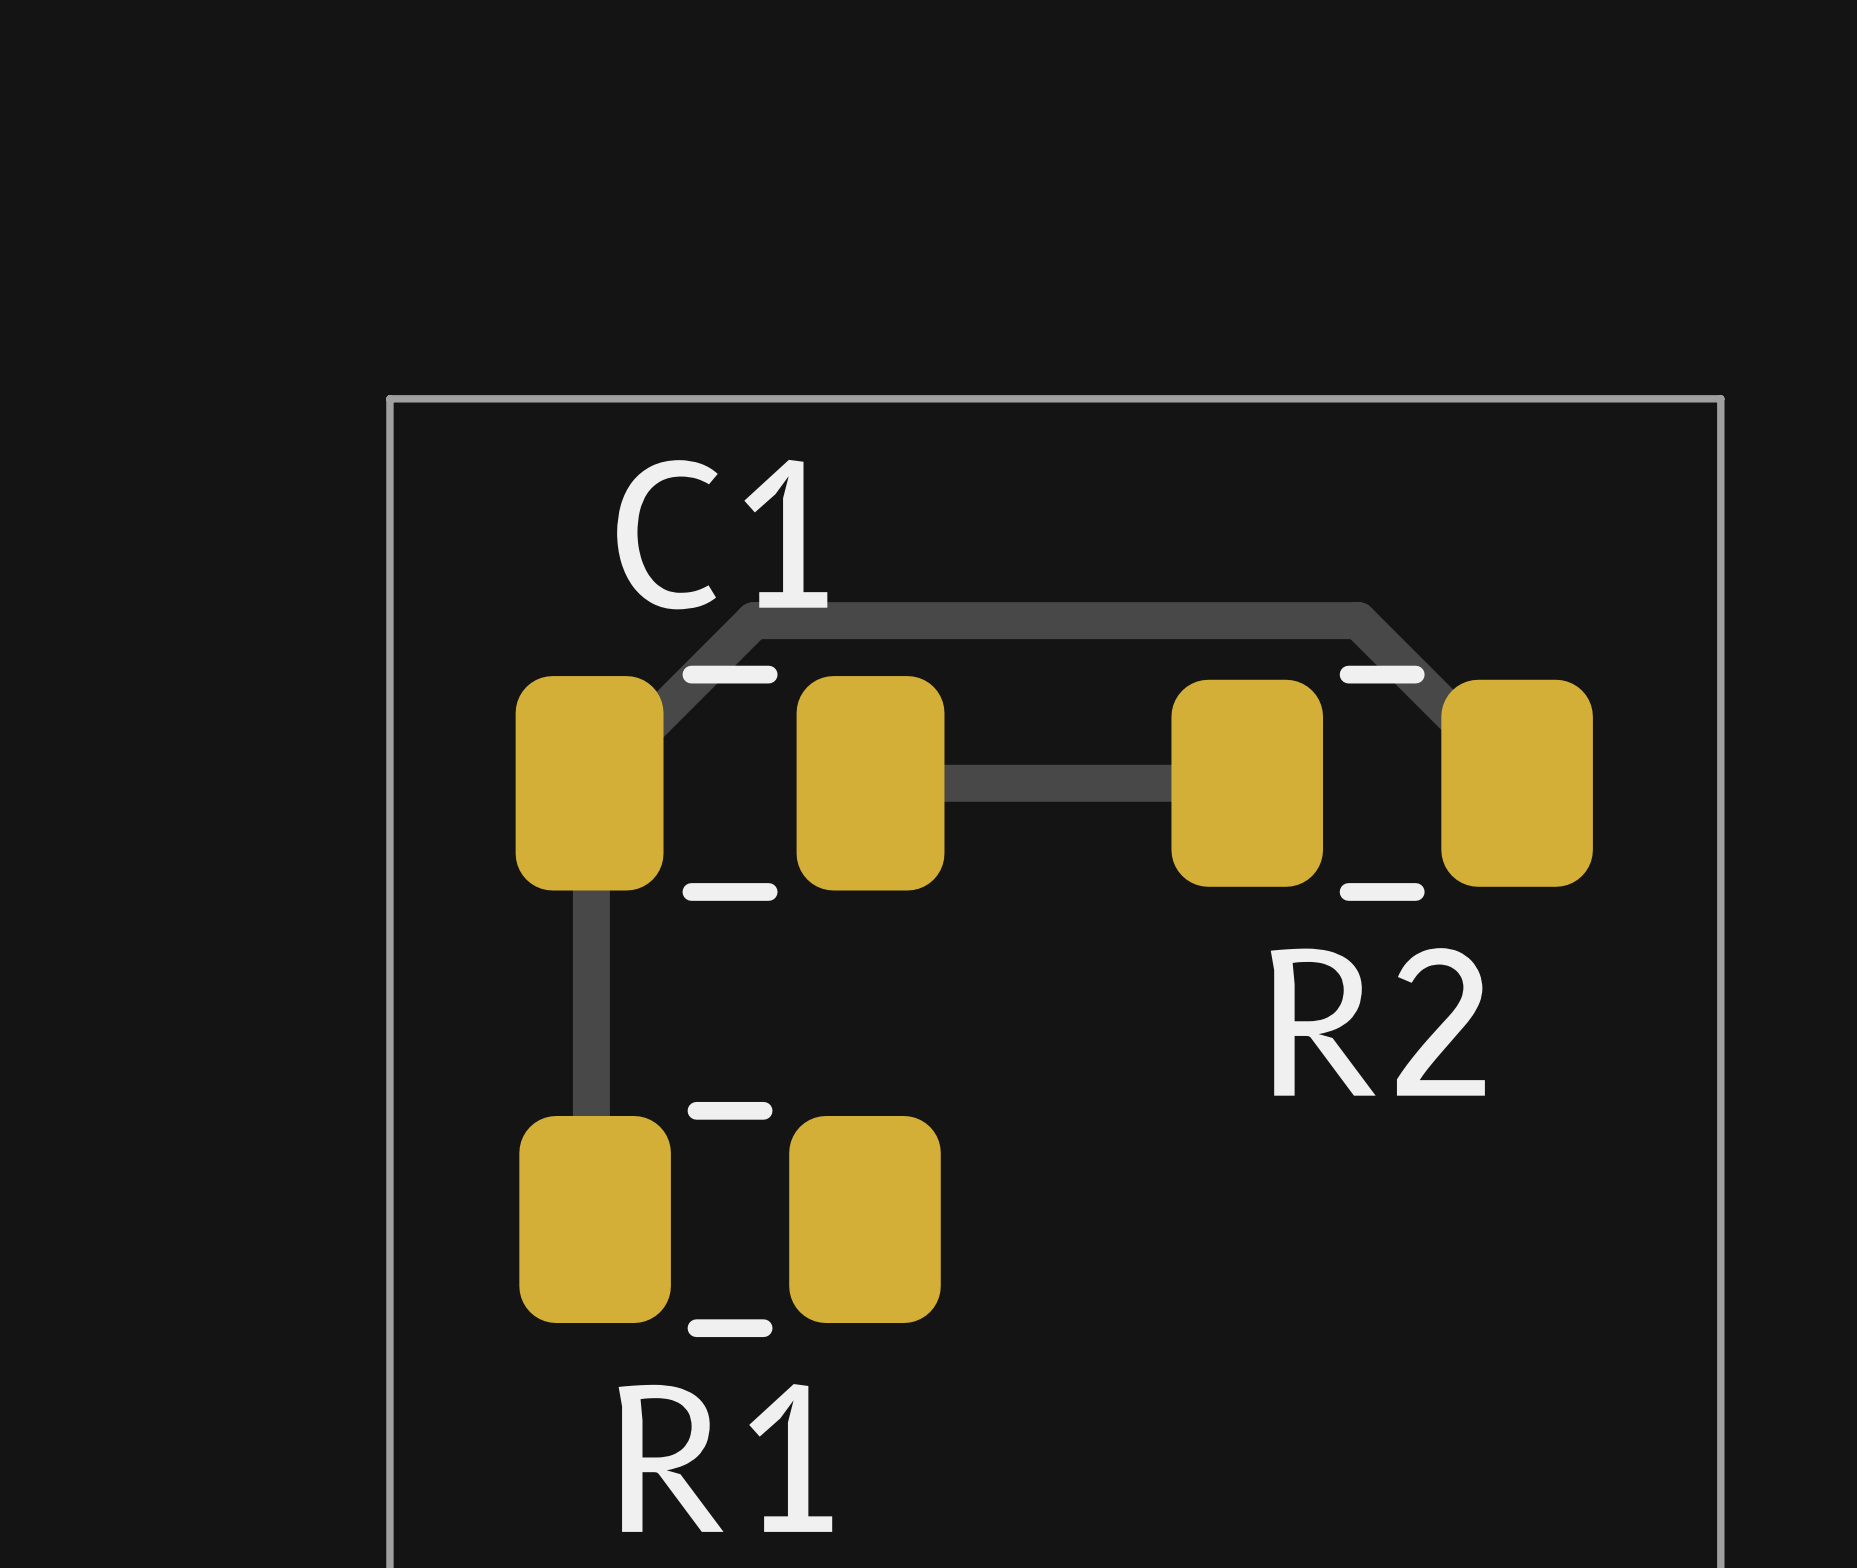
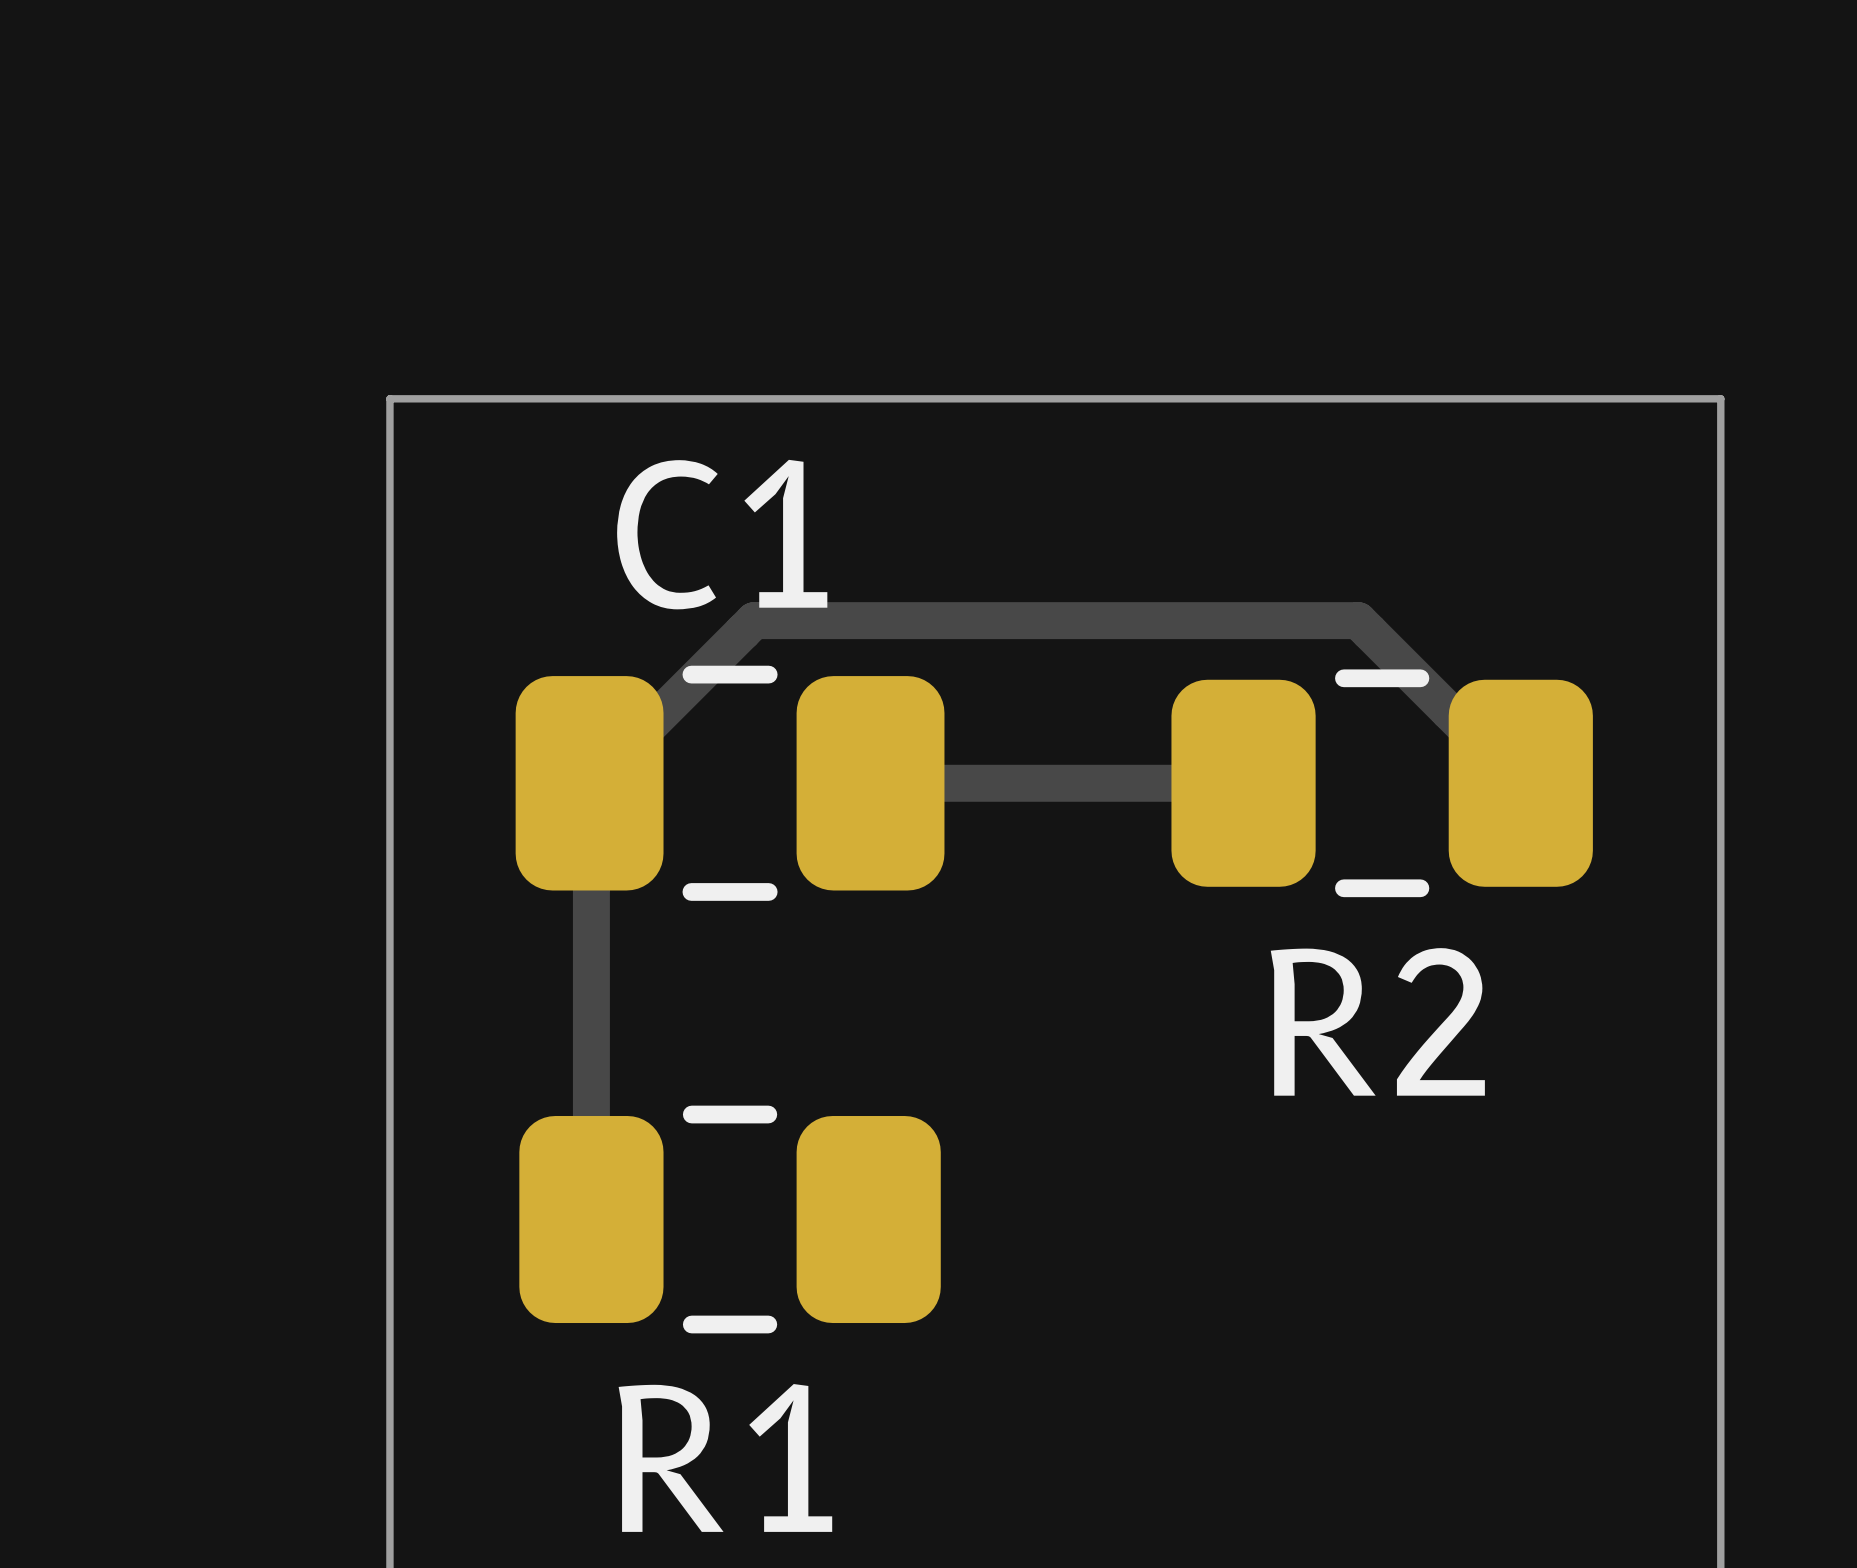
R2 footprint: [1171, 665, 1593, 901] -> [1171, 669, 1593, 898]
R1 footprint: [519, 1101, 941, 1338] -> [519, 1105, 941, 1334]

